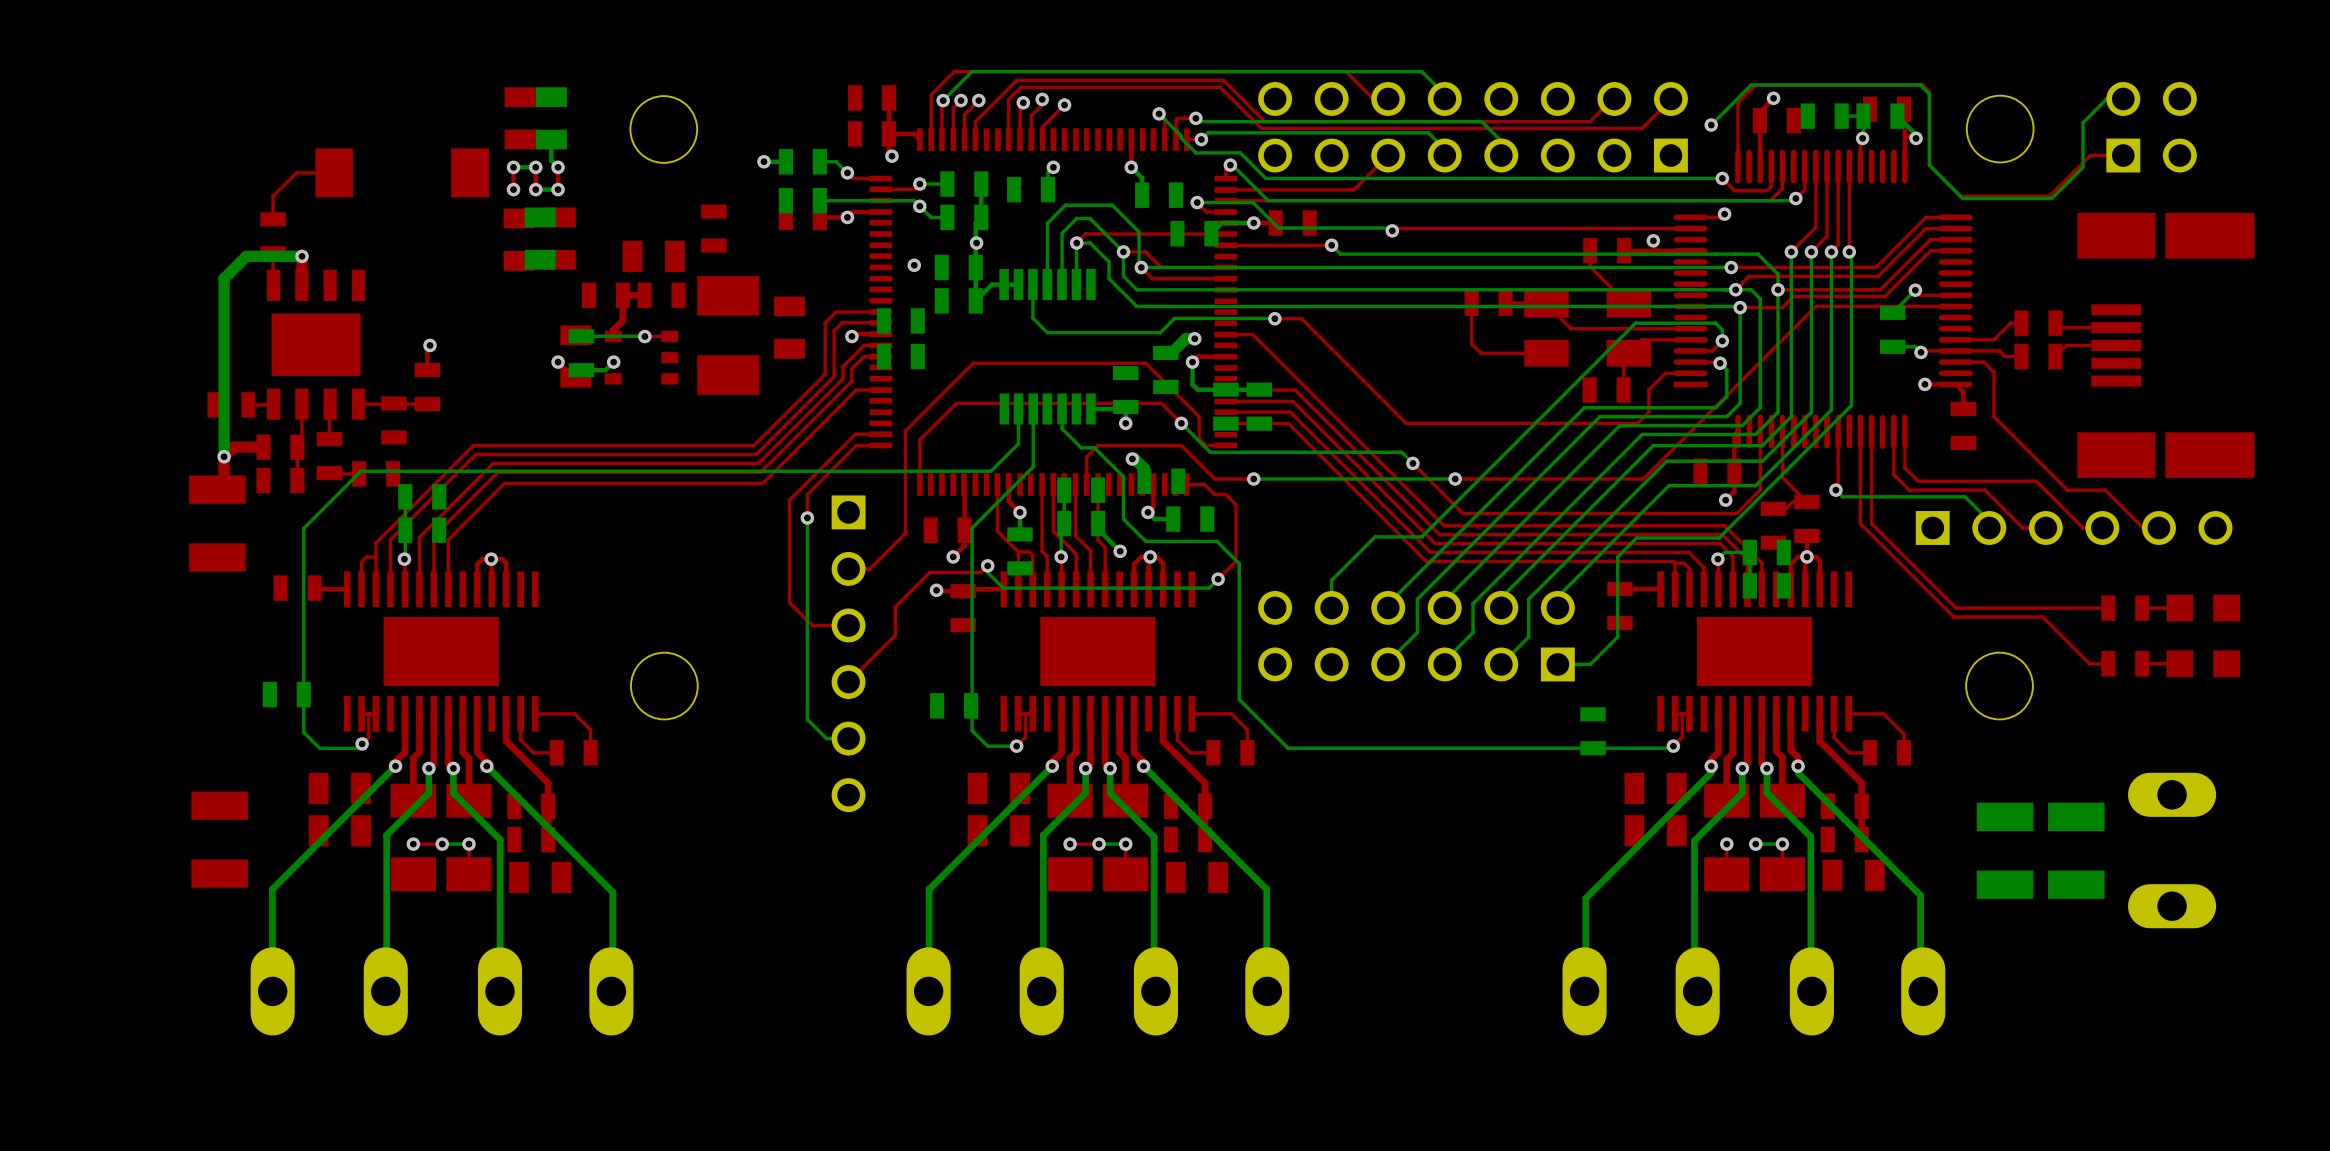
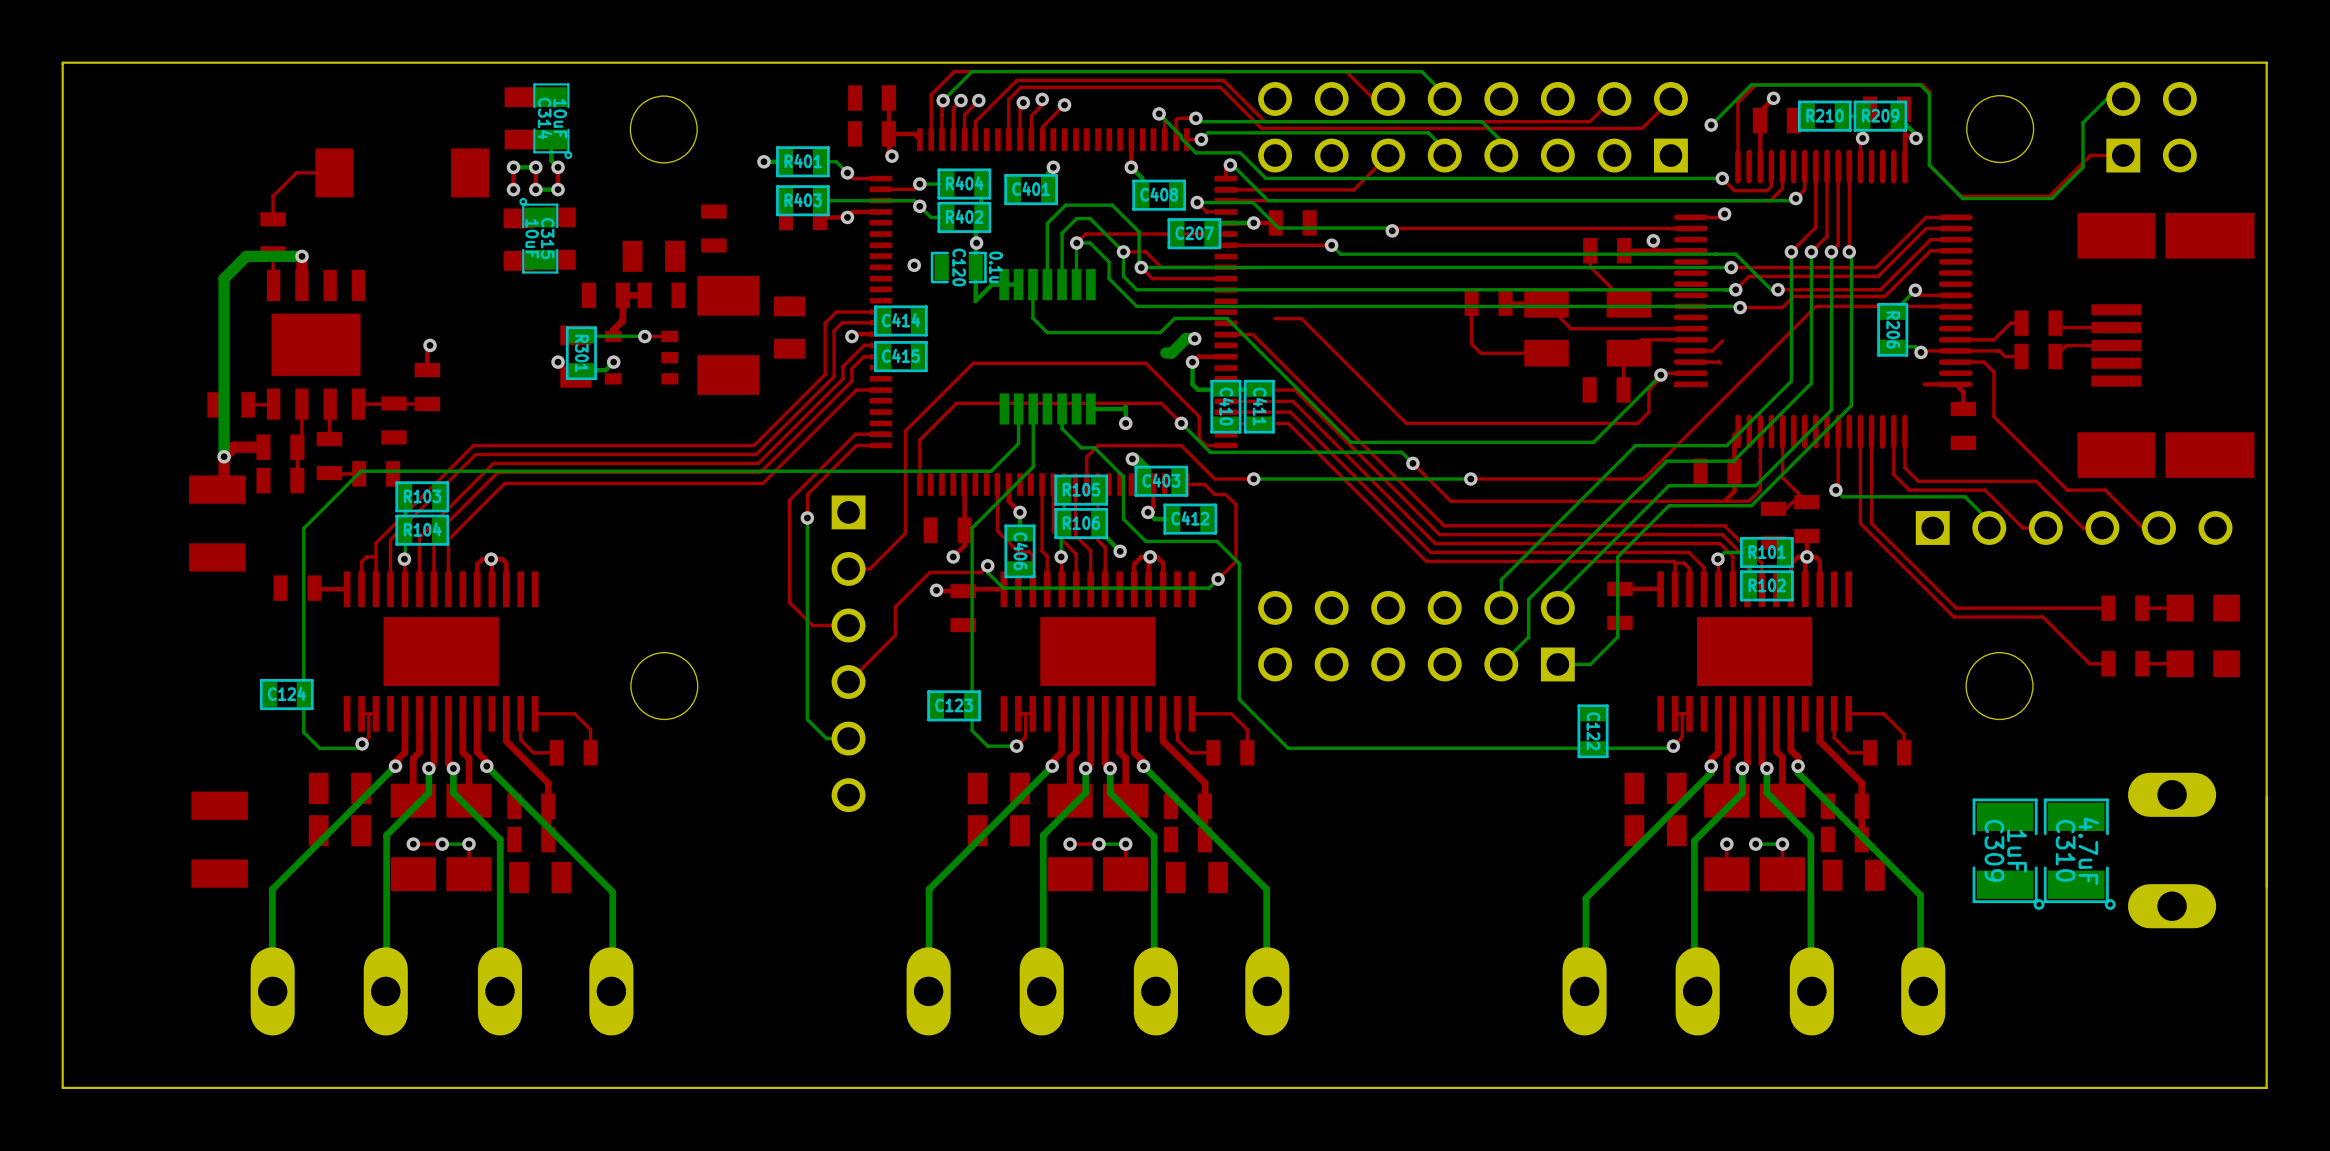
board edge: none -> (2266, 62) (63, 62)
board edge: none -> (2266, 62) (2266, 1087) (62, 1087) (62, 62)
part: (1824, 116) -> none
R210: none -> (1824, 116)
part: (1880, 116) -> none
R209: none -> (1880, 116)
part: (551, 118) -> none
C314: none -> 10uF (552, 121)
part: (802, 161) -> none
R401: none -> (802, 161)
part: (964, 184) -> none
R404: none -> (964, 184)
part: (1031, 189) -> none
C401: none -> (1031, 189)
part: (1159, 195) -> none
C408: none -> (1159, 195)
part: (802, 200) -> none
R403: none -> (802, 200)
part: (964, 217) -> none
R402: none -> (964, 217)
part: (1194, 233) -> none
C207: none -> (1194, 233)
C315: none -> 10uF (538, 235)
part: (540, 238) -> none
bottom track: (1735, 254) (1757, 254) (1778, 274) (1778, 412) (1755, 434) (1642, 434) (1473, 603) (1473, 632) (1444, 660) (1444, 664) -> (1735, 254) (1771, 289) (1778, 289)
part: (958, 267) -> none
C120: none -> 0.1u (958, 267)
bottom track: (1735, 289) (1751, 289) (1760, 298) (1760, 407) (1742, 425) (1619, 425) (1444, 600) (1444, 607) -> none
part: (958, 300) -> none
bottom track: (1740, 307) (1740, 403) (1726, 416) (1599, 416) (1417, 599) (1417, 632) (1388, 661) (1388, 664) -> none
bottom track: (1274, 318) (1227, 318) -> (1660, 375) (1593, 442) (1350, 442) (1227, 318)
via: (1274, 318) -> none
part: (900, 320) -> none
C414: none -> (900, 320)
part: (1892, 329) -> none
R206: none -> (1892, 329)
bottom track: (1722, 340) (1722, 329) (1715, 323) (1635, 323) (1421, 536) (1375, 536) (1331, 580) (1331, 607) -> none
via: (1722, 340) -> none
part: (581, 353) -> none
R301: none -> (581, 353)
part: (900, 356) -> none
C415: none -> (900, 356)
bottom track: (1720, 363) (1726, 369) (1726, 396) (1715, 407) (1584, 407) (1388, 603) (1388, 607) -> none
via: (1720, 363) -> none
part: (1165, 369) -> none
via: none -> (1660, 375)
bottom track: (1791, 381) (1791, 416) (1762, 445) (1726, 445) -> (1791, 381) (1726, 445)
bottom track: (1811, 383) (1811, 412) (1762, 461) (1733, 461) -> (1811, 383) (1733, 461)
via: (1924, 384) -> none
part: (1125, 389) -> none
part: (1225, 406) -> none
C410: none -> (1225, 406)
part: (1259, 406) -> none
C411: none -> (1259, 406)
bottom track: (1653, 445) (1501, 597) -> (1653, 445) (1635, 445) (1501, 579) (1501, 597)
via position: (1455, 479) -> (1470, 479)
bottom track: none -> (1470, 479) (1455, 479)
top track: (1470, 479) (1455, 479) -> none
part: (1161, 481) -> none
C403: none -> (1161, 481)
part: (1081, 490) -> none
R105: none -> (1081, 490)
part: (422, 496) -> none
R103: none -> (422, 496)
via: (1725, 500) -> none
top track: (1749, 501) (1736, 513) (1463, 513) (1450, 501) -> (1749, 501) (1450, 501)
bottom track: (1751, 505) (1719, 538) (1636, 538) -> (1751, 505) (1668, 505) (1636, 538)
part: (1190, 519) -> none
C412: none -> (1190, 519)
part: (1081, 523) -> none
R106: none -> (1081, 523)
part: (422, 530) -> none
R104: none -> (422, 530)
part: (1019, 551) -> none
C406: none -> (1019, 551)
part: (1766, 552) -> none
R101: none -> (1766, 552)
part: (1766, 585) -> none
R102: none -> (1766, 585)
part: (286, 694) -> none
C124: none -> (286, 694)
part: (954, 705) -> none
C123: none -> (954, 705)
part: (1593, 731) -> none
C122: none -> (1593, 731)
part: (2005, 850) -> none
part: (2076, 850) -> none
C309: none -> 1uF (2008, 854)
C310: none -> 4.7uF (2079, 854)

